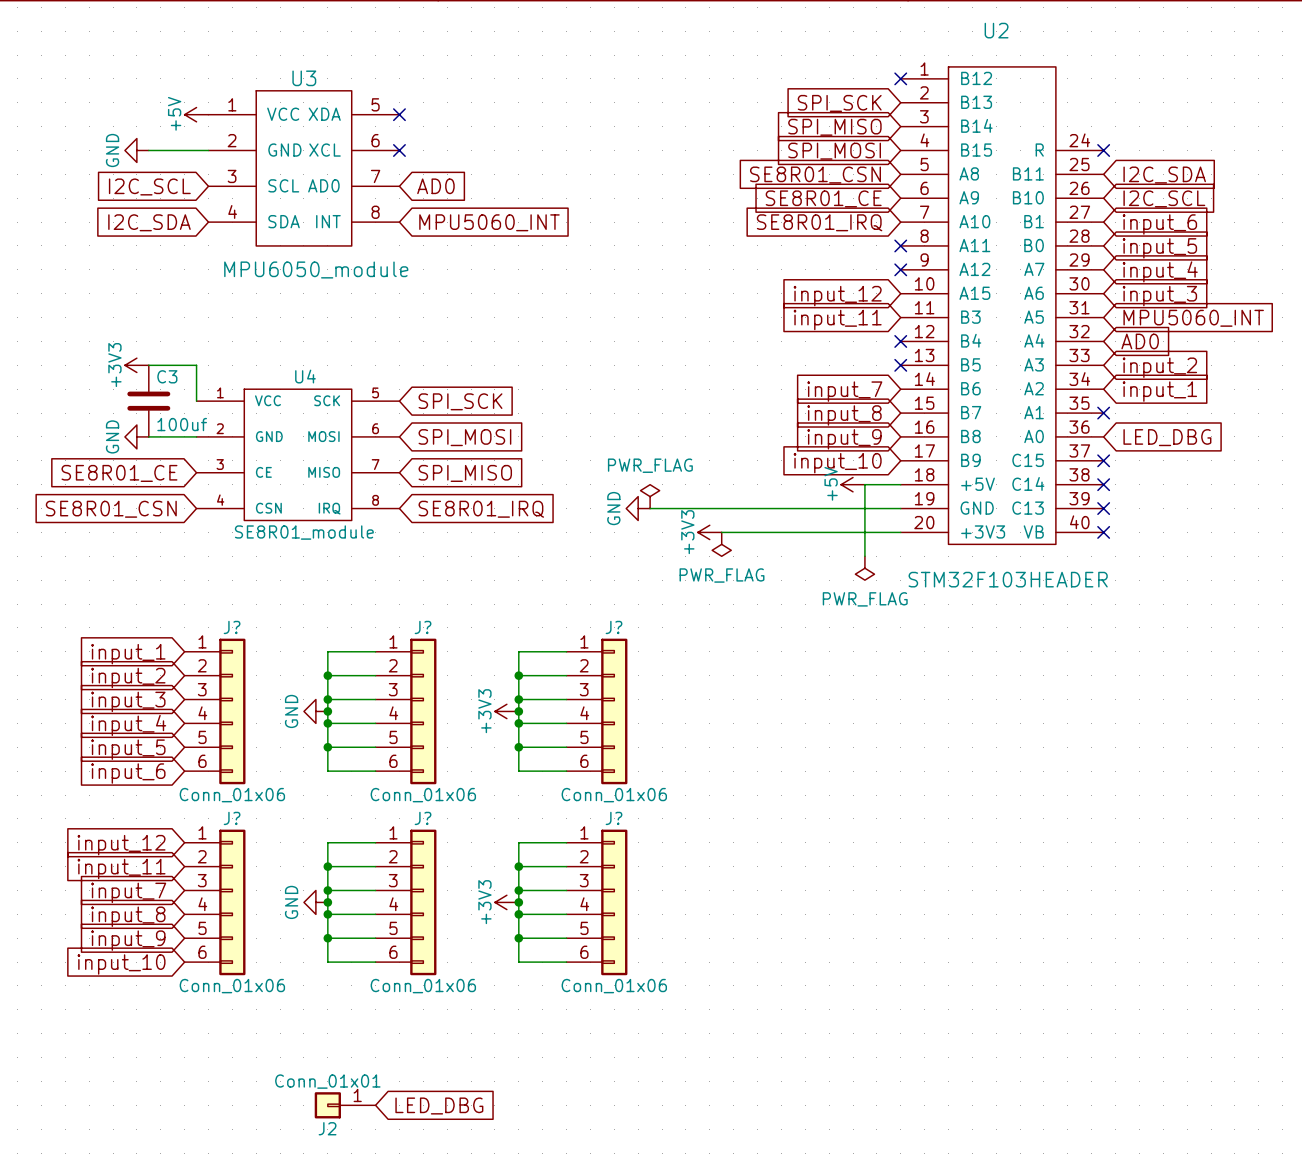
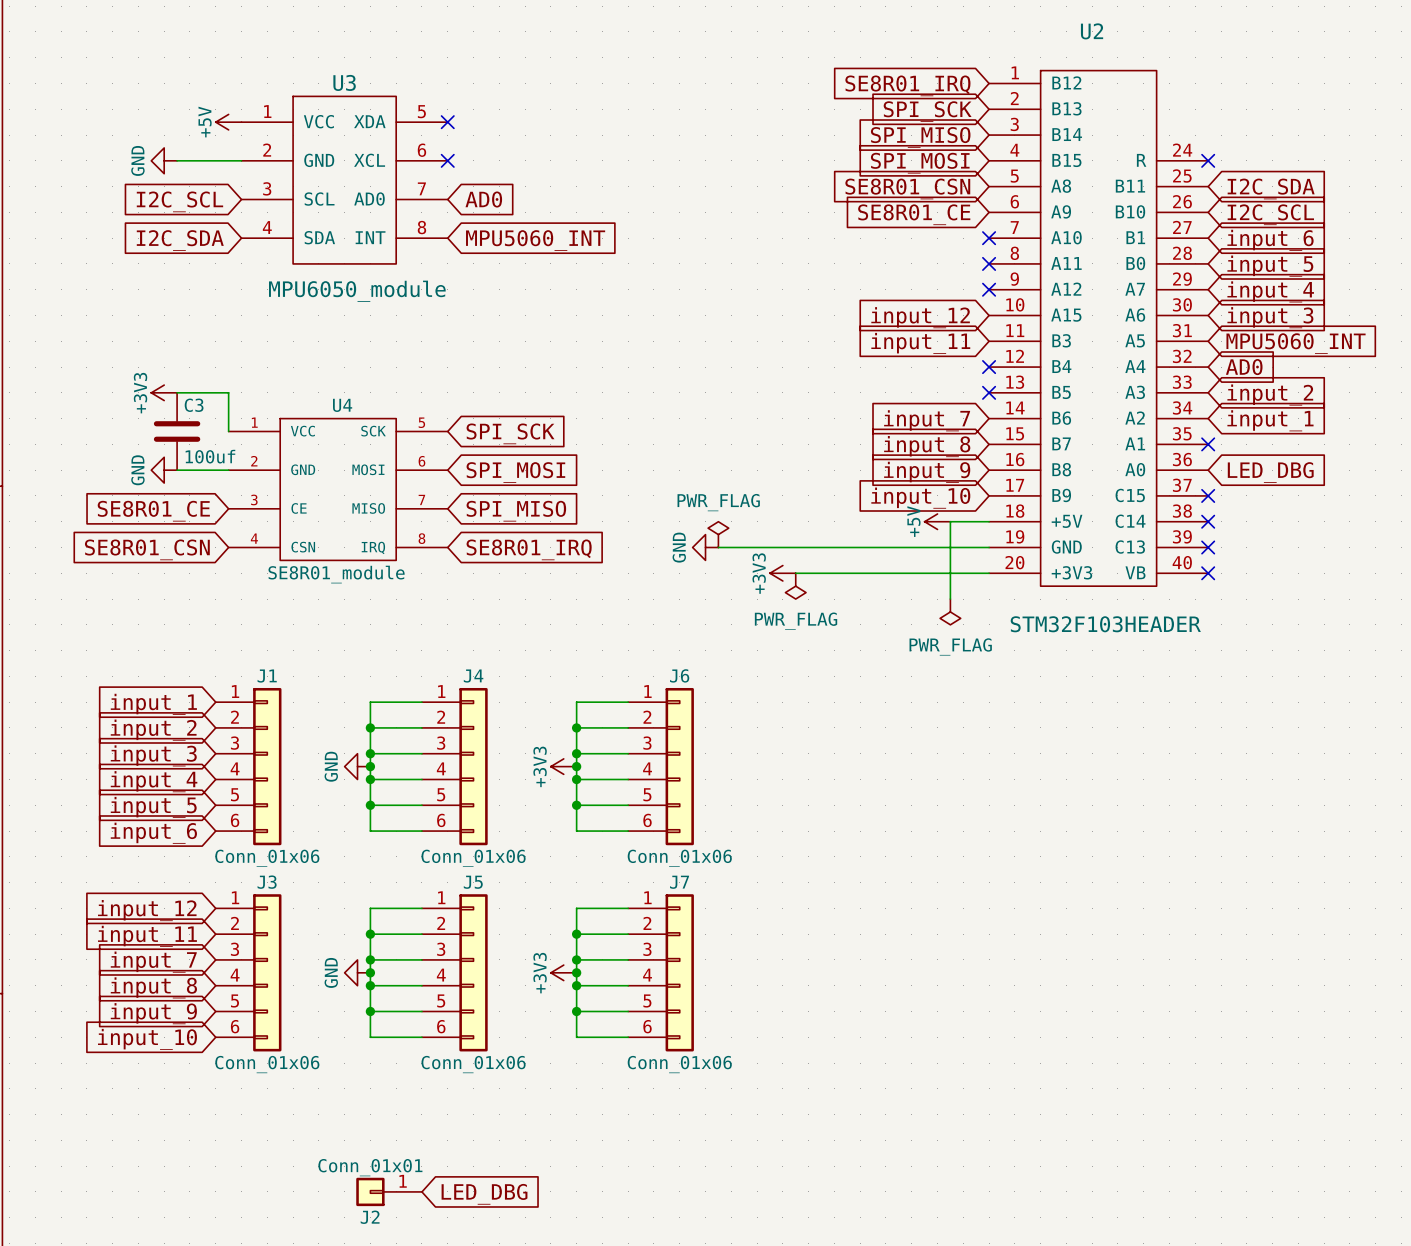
no-connect mark: (900, 78) -> none
global label position: SE8R01_IRQ (819, 222) -> SE8R01_IRQ (907, 85)
no-connect mark: none -> (989, 238)
J? name: J? (232, 627) -> J1 (267, 676)
J? name: J? (423, 627) -> J4 (473, 676)
J? name: J? (614, 627) -> J6 (679, 675)
J? name: J? (232, 818) -> J3 (267, 882)
J? name: J? (423, 818) -> J5 (473, 882)
J? name: J? (614, 818) -> J7 (679, 882)

